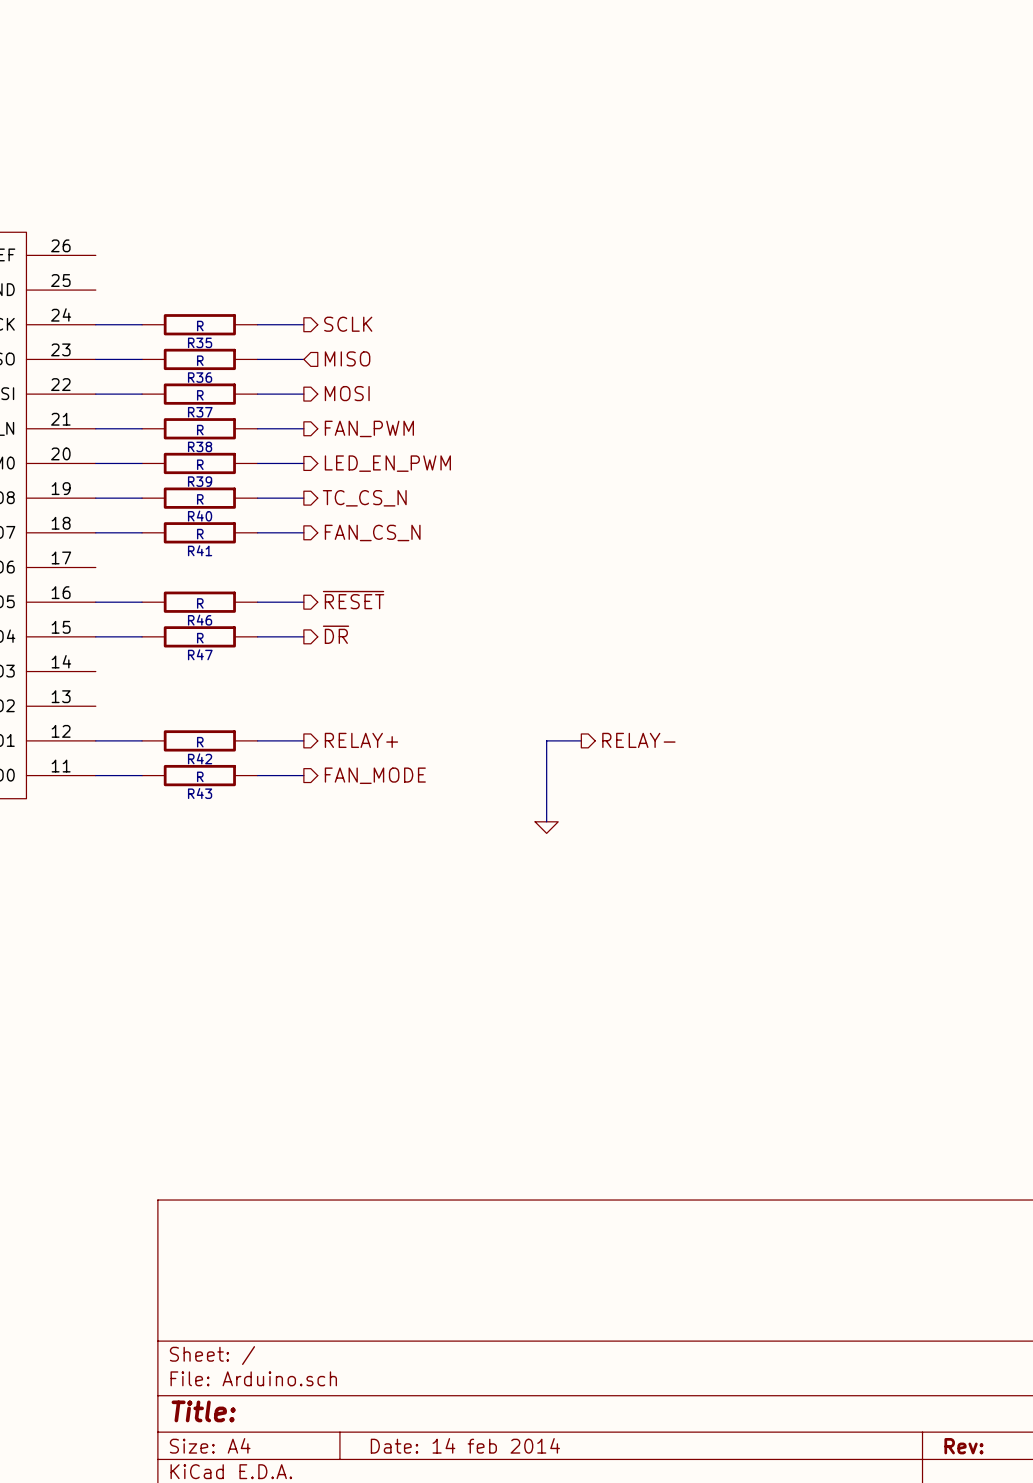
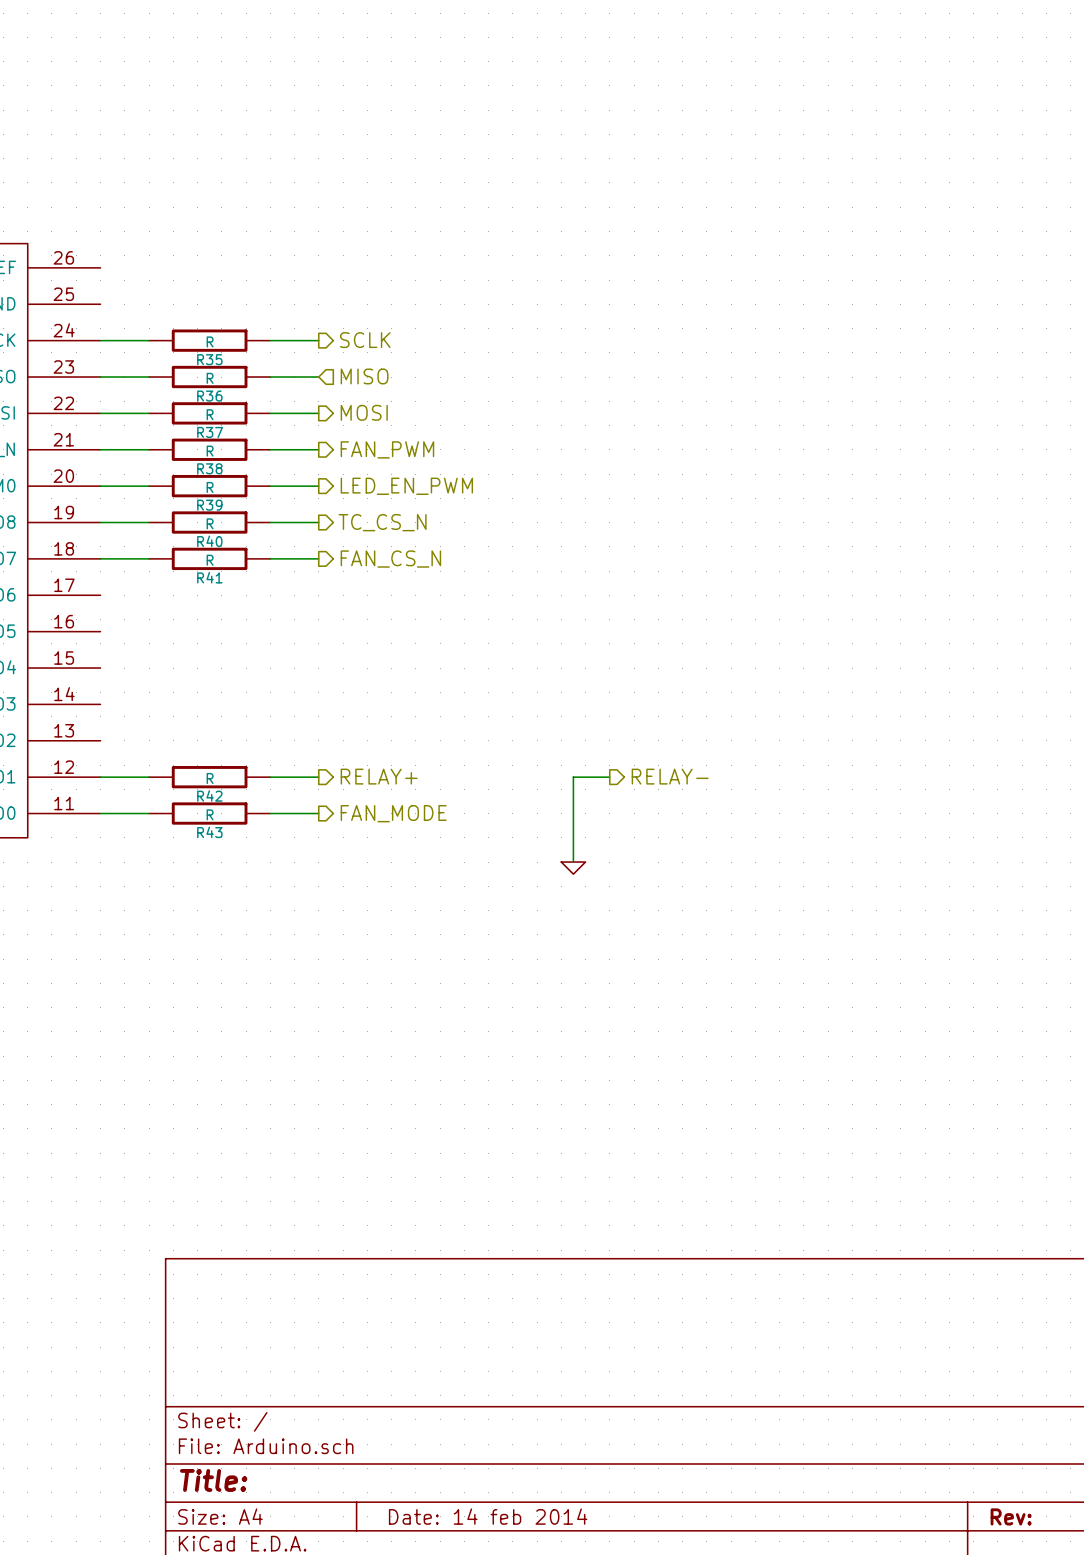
hierarchical label: ~{RESET} (353, 600) -> none
wire: (95, 602) (142, 602) -> none
R46: R (199, 602) -> none
wire: (257, 602) (303, 602) -> none
hierarchical label: ~{DR} (336, 634) -> none
wire: (95, 636) (142, 636) -> none
R47: R (199, 636) -> none
wire: (257, 636) (303, 636) -> none

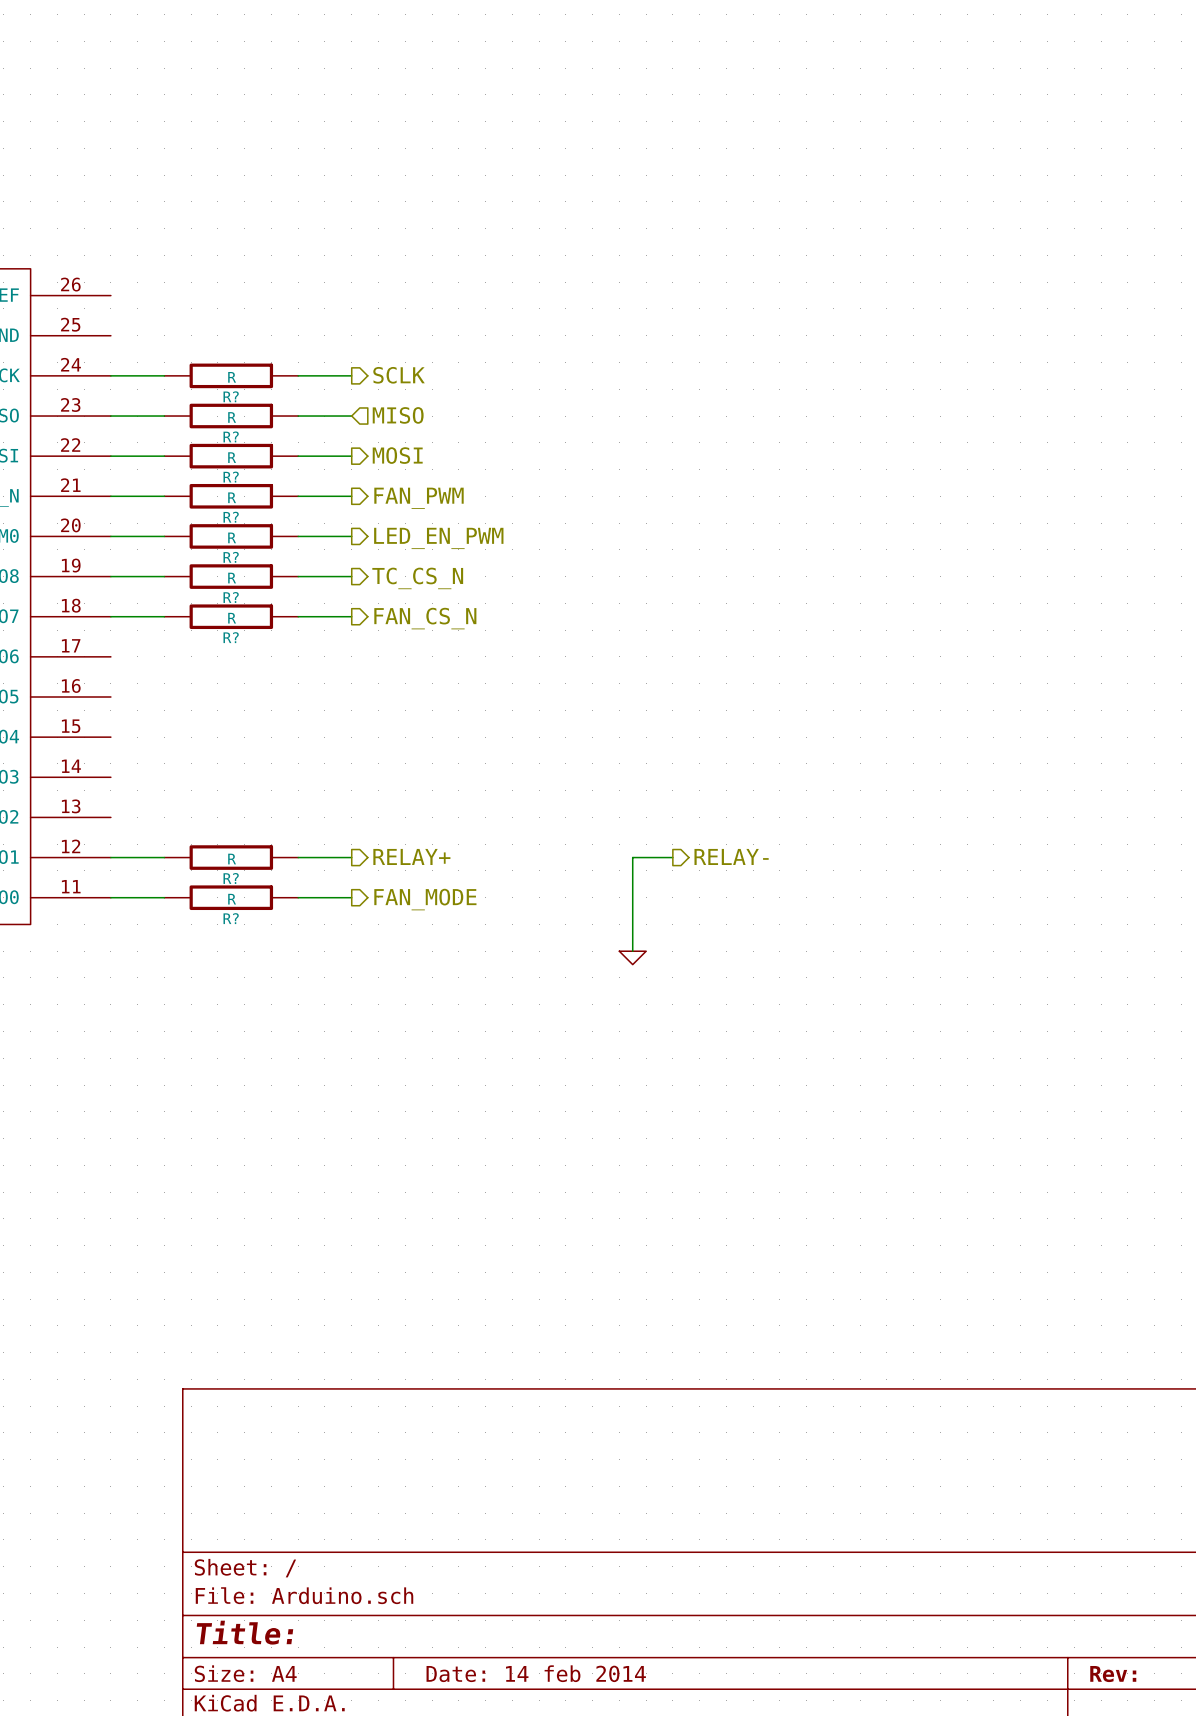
R35 name: R35 (209, 359) -> R? (231, 396)
R36 name: R36 (209, 396) -> R? (231, 436)
R37 name: R37 (210, 432) -> R? (231, 477)
R38 name: R38 (209, 468) -> R? (231, 517)
R39 name: R39 (209, 505) -> R? (231, 557)
R40 name: R40 (209, 541) -> R? (231, 597)
R41 name: R41 (209, 577) -> R? (231, 637)
R42 name: R42 (209, 795) -> R? (231, 878)
R43 name: R43 (209, 832) -> R? (231, 918)

